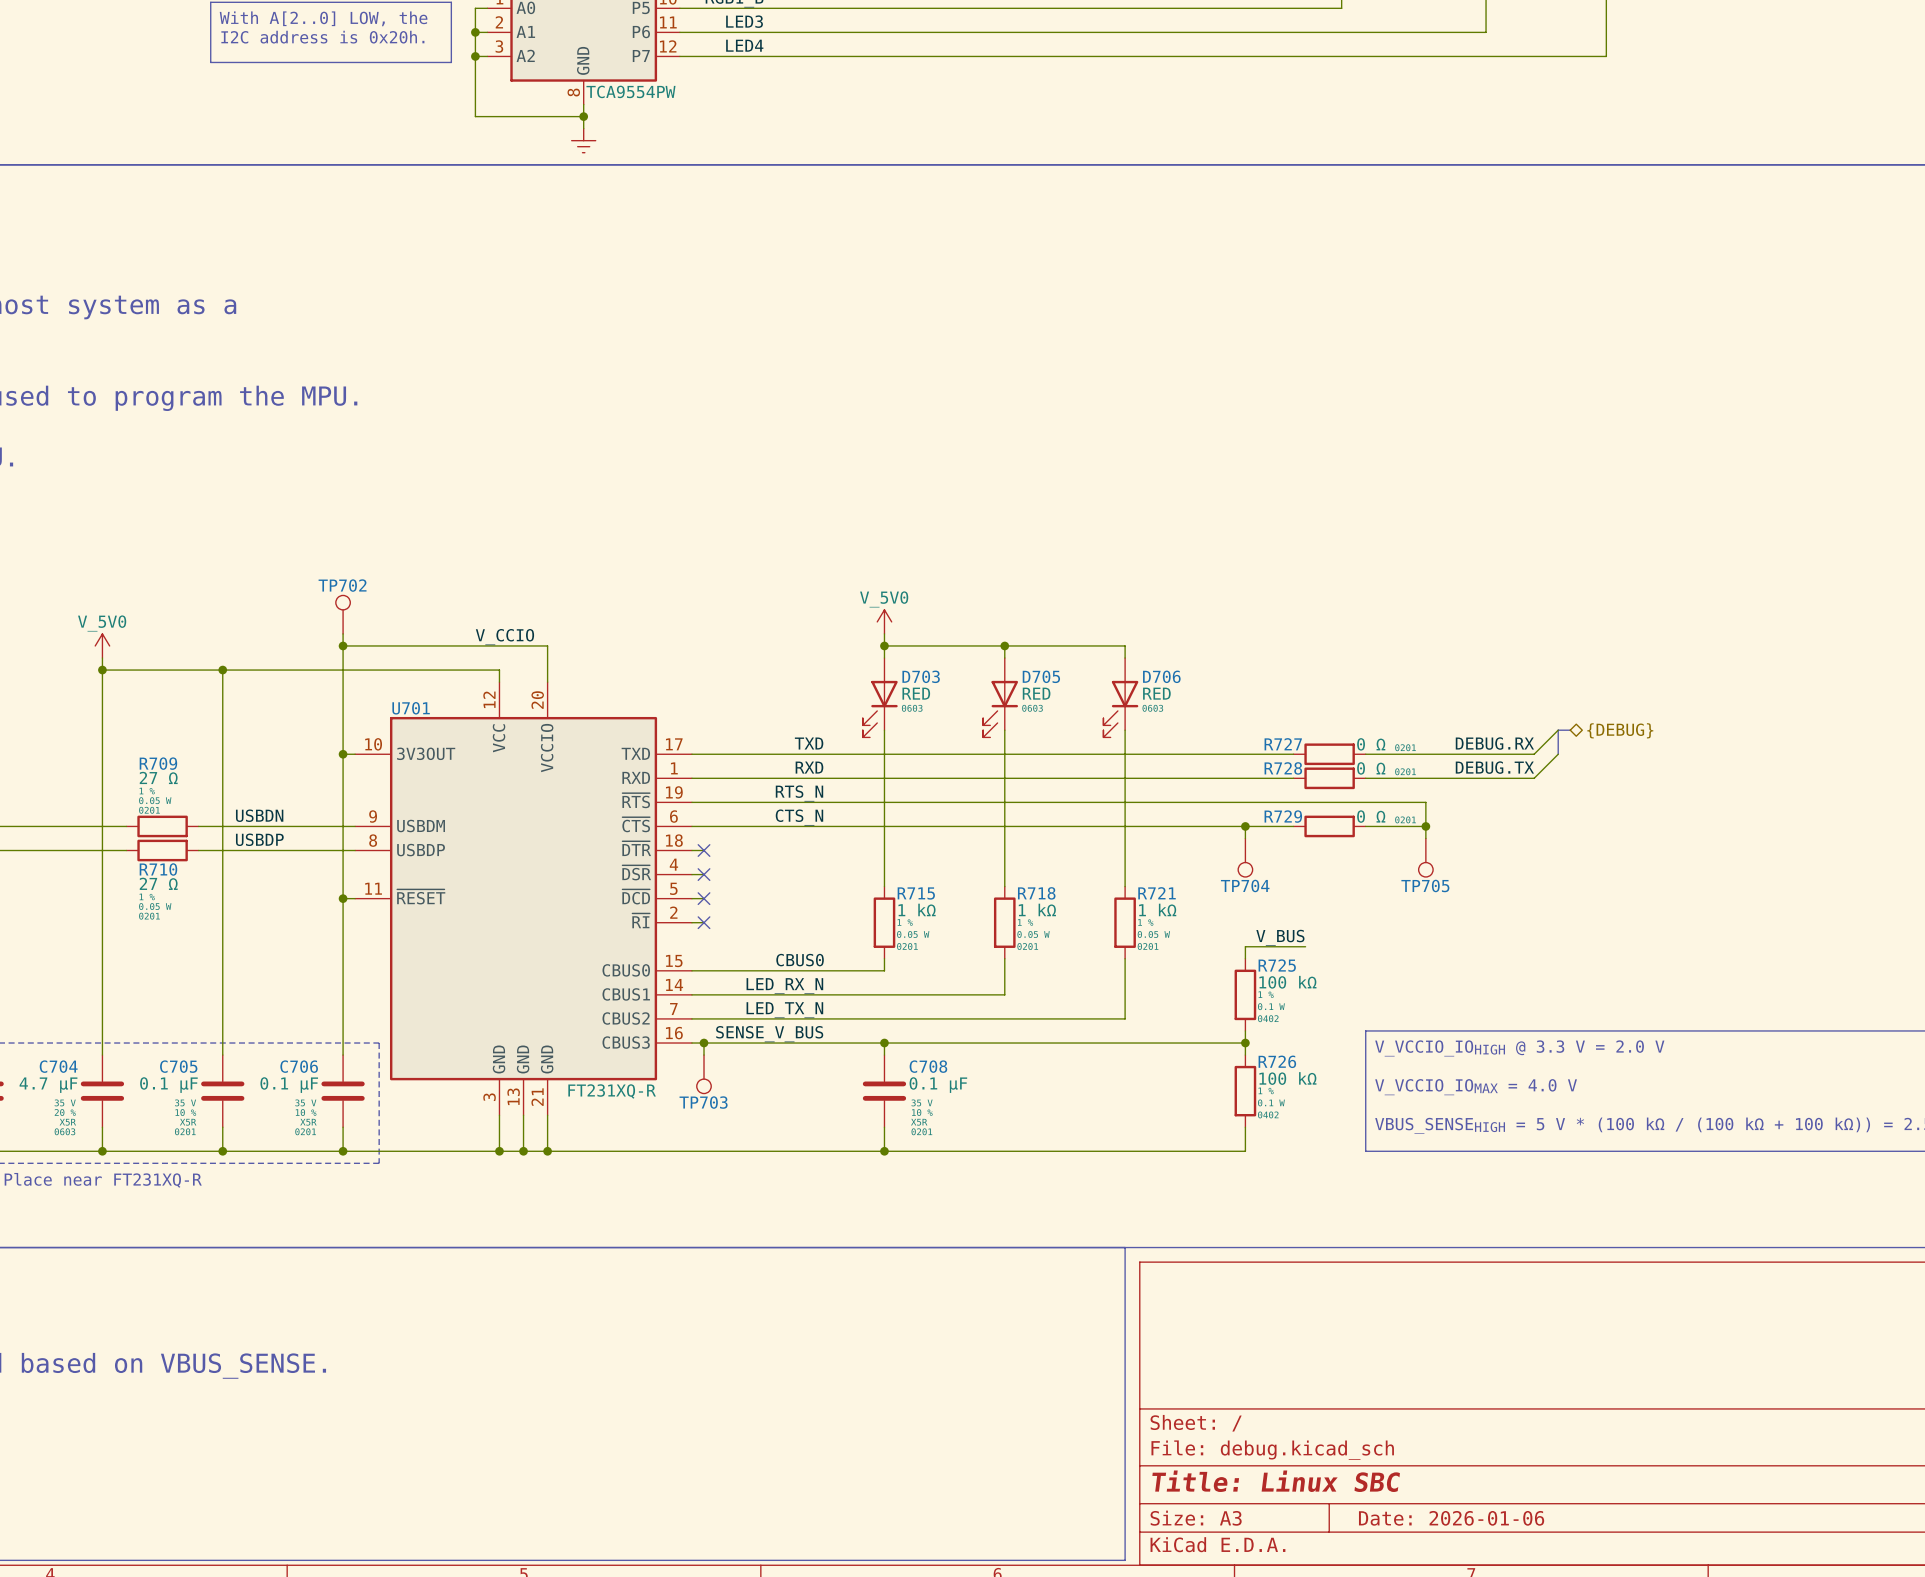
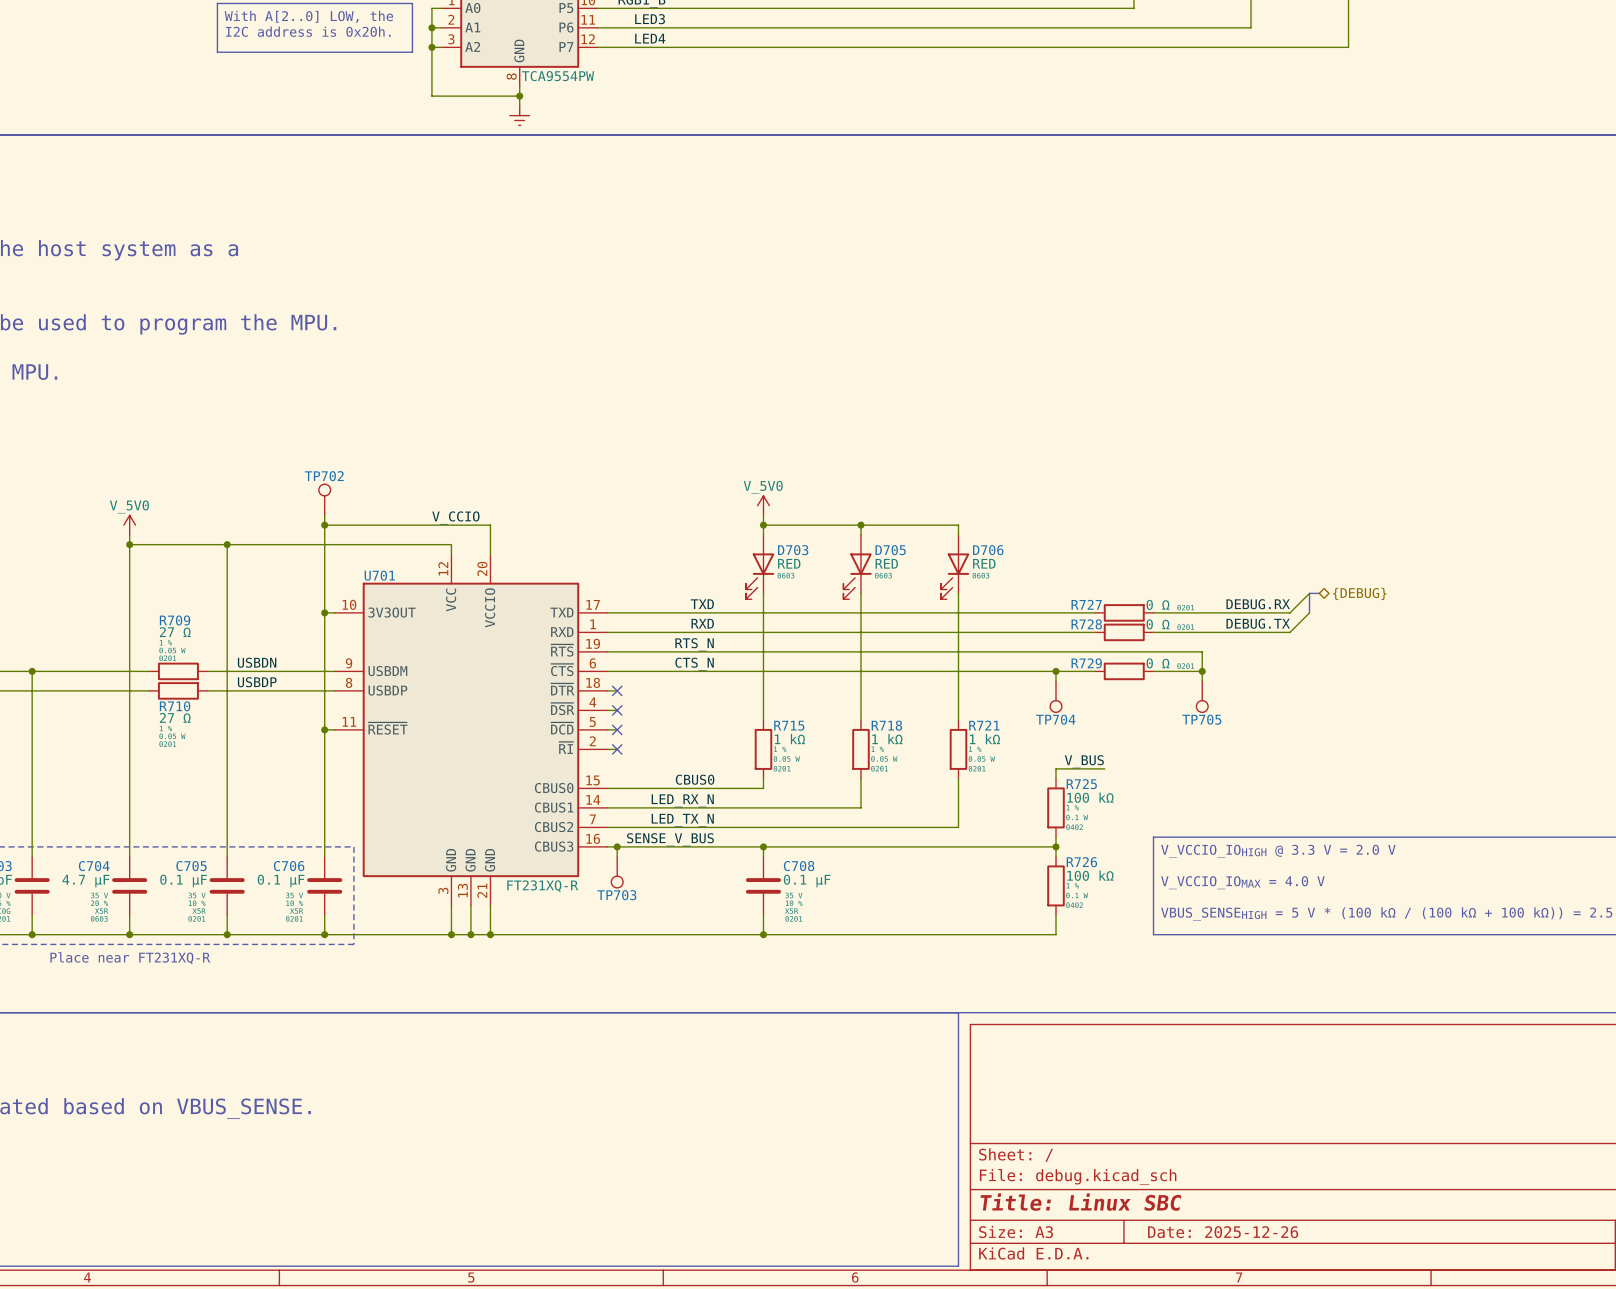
title block: Date: 2026-01-06 (1451, 1518) -> Date: 2025-12-26 (1223, 1232)

